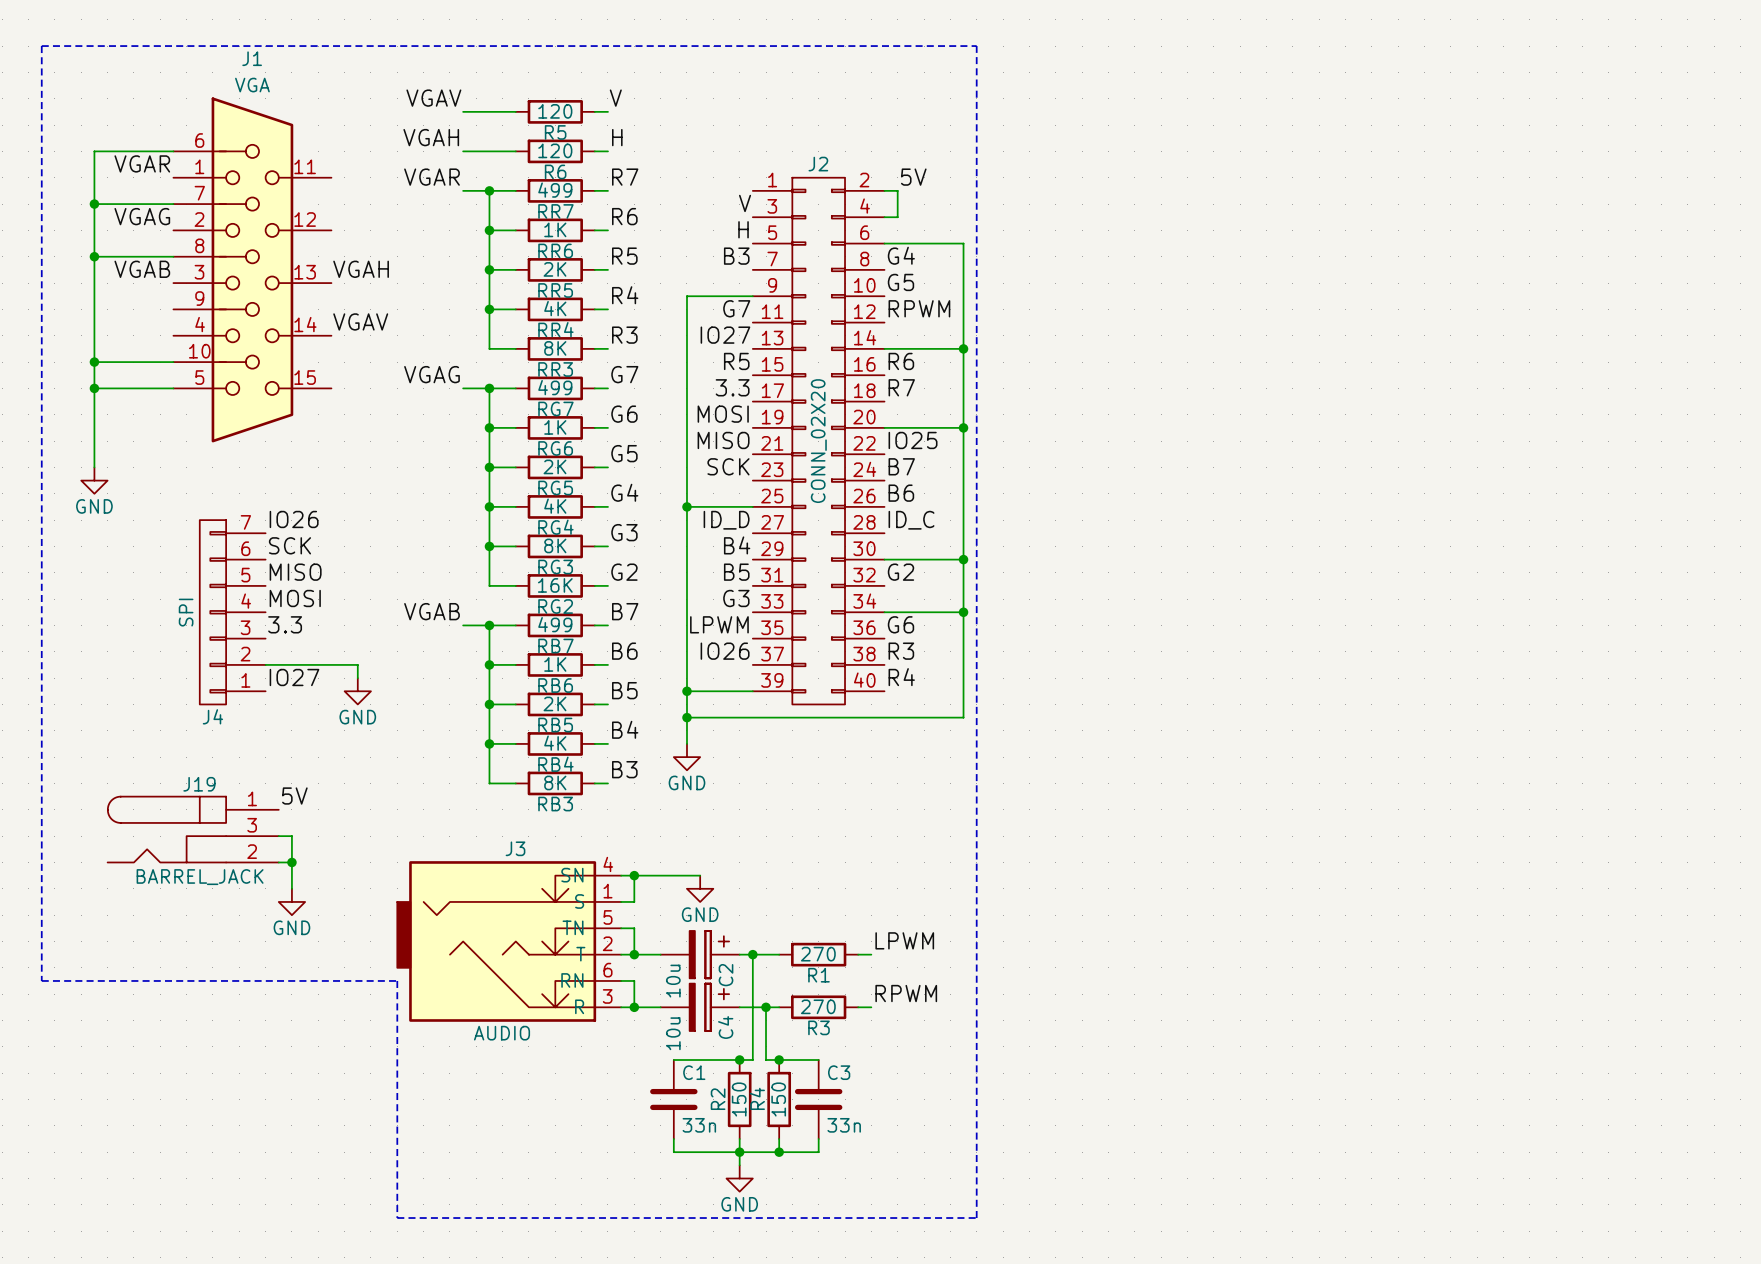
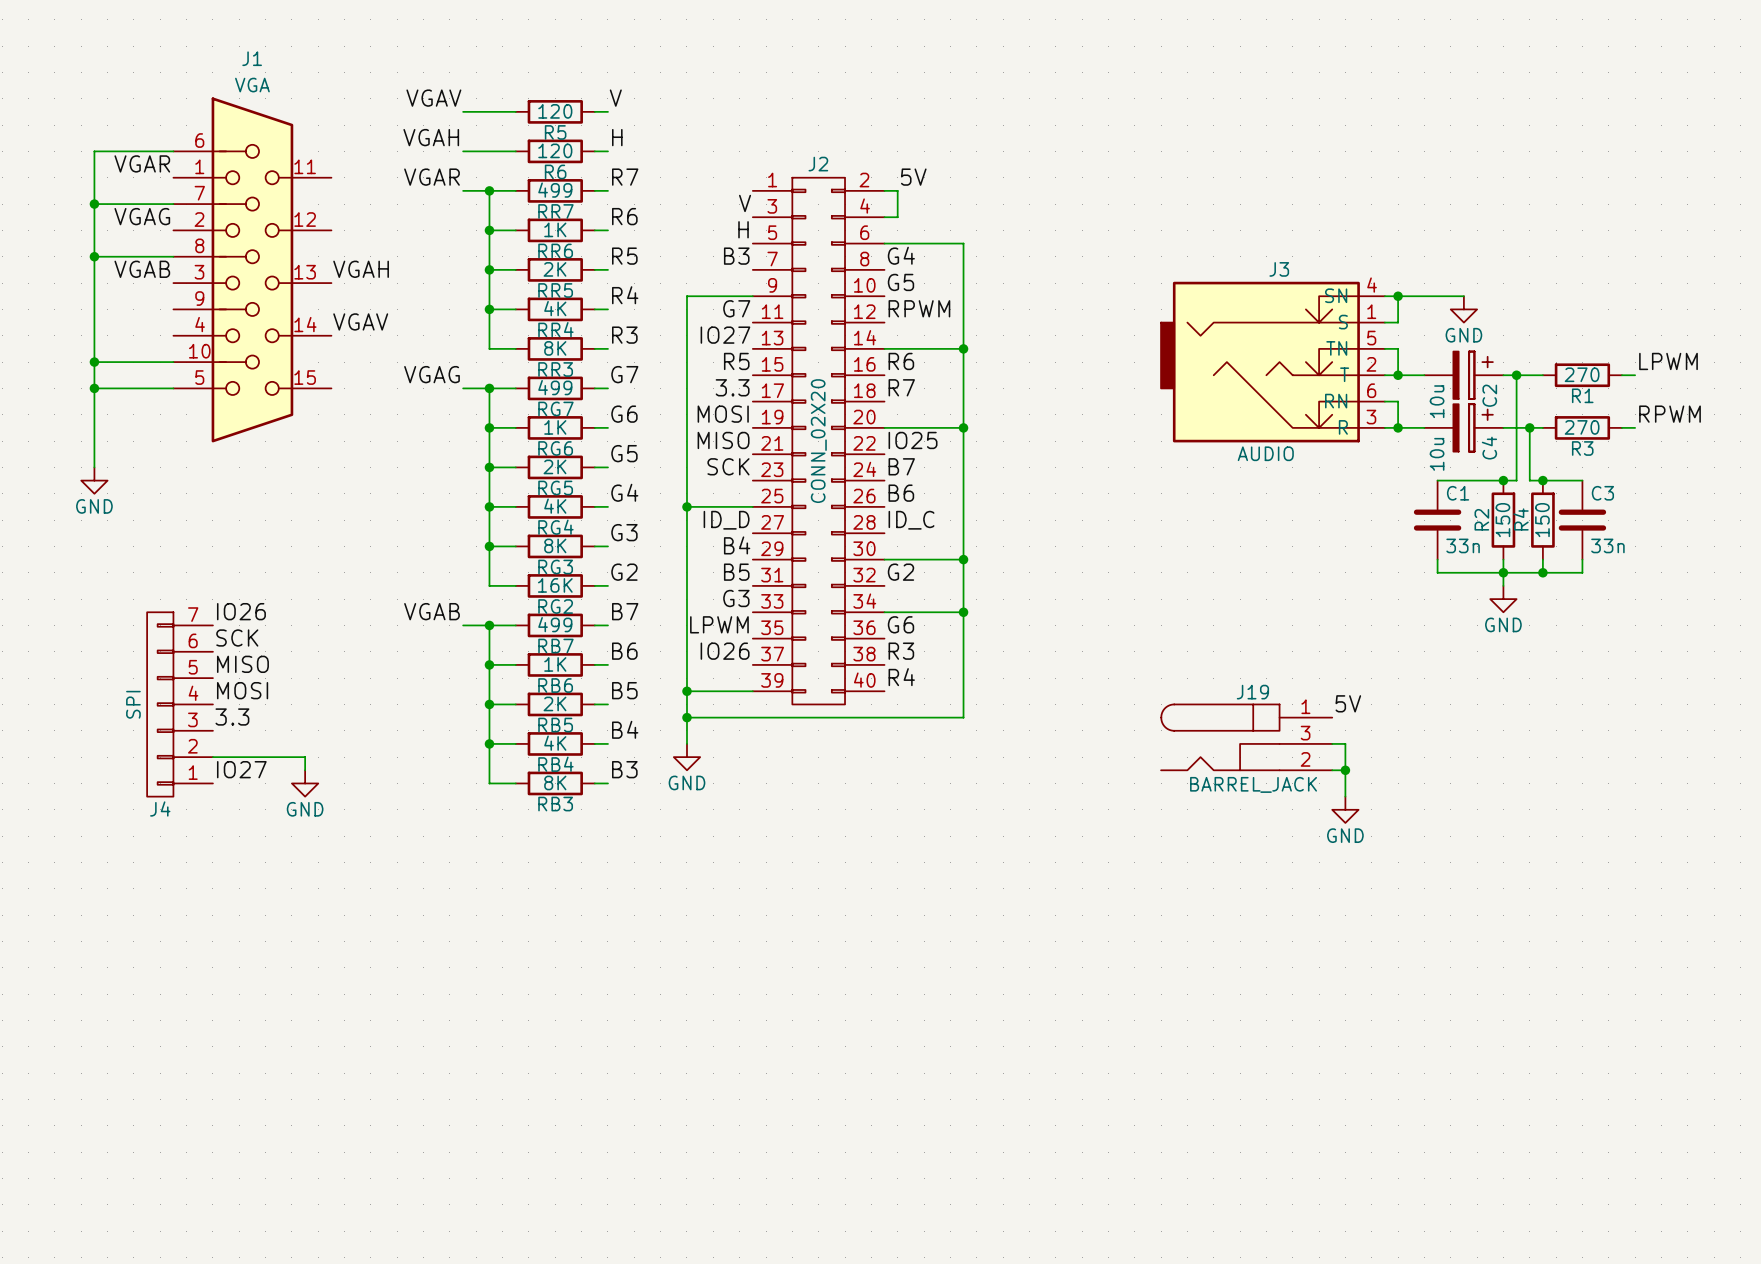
line: (41, 46) (976, 46) (976, 1218) (397, 1218) (397, 980) (41, 980) (41, 46) -> none
wire: none -> (1384, 296) (1463, 296)
wire: none -> (1398, 296) (1398, 322) (1384, 322)
junction: none -> (1398, 296)
power symbol: none -> GND (1463, 309)
wire: none -> (1384, 348) (1398, 348) (1398, 375)
label: none -> LPWM (1668, 361)
wire: none -> (1384, 375) (1424, 375)
junction: none -> (1398, 375)
wire: none -> (1503, 375) (1542, 375)
wire: none -> (1516, 375) (1516, 480) (1437, 480)
junction: none -> (1516, 375)
wire: none -> (1621, 375) (1635, 375)
wire: none -> (1384, 401) (1398, 401) (1398, 427)
label: none -> RPWM (1670, 414)
wire: none -> (1384, 427) (1424, 427)
junction: none -> (1398, 427)
wire: none -> (1503, 427) (1542, 427)
wire: none -> (1529, 427) (1529, 480) (1582, 480)
junction: none -> (1529, 427)
wire: none -> (1621, 427) (1635, 427)
junction: none -> (1503, 480)
junction: none -> (1542, 480)
label position: IO26 (294, 519) -> IO26 (241, 611)
label position: SCK (289, 545) -> SCK (237, 637)
wire: none -> (1437, 559) (1437, 572) (1582, 572) (1582, 559)
wire: none -> (1503, 559) (1503, 585)
wire: none -> (1542, 559) (1542, 572)
label position: MISO (295, 572) -> MISO (242, 664)
junction: none -> (1503, 572)
junction: none -> (1542, 572)
label position: MOSI (295, 598) -> MOSI (242, 690)
power symbol: none -> GND (1503, 599)
J4 position: (232, 612) -> (180, 704)
label position: 3.3 (285, 624) -> 3.3 (232, 717)
wire: (265, 664) (357, 664) (357, 678) -> (212, 757) (305, 757) (305, 770)
label position: IO27 (294, 677) -> IO27 (241, 769)
power symbol: GND (357, 691) -> none
label: none -> 5V (1348, 703)
wire: none -> (1332, 743) (1345, 743) (1345, 796)
wire: none -> (1332, 770) (1345, 770)
junction: none -> (1345, 770)
power symbol: none -> GND (305, 783)
label: 5V (294, 796) -> none
power symbol: none -> GND (1345, 809)
J19 position: (193, 829) -> (1246, 737)
wire: (278, 836) (291, 836) (291, 888) -> none
wire: (278, 862) (291, 862) -> none
junction: (291, 862) -> none
wire: (621, 875) (700, 875) -> none
wire: (634, 875) (634, 901) (621, 901) -> none
junction: (634, 875) -> none
power symbol: GND (700, 888) -> none
power symbol: GND (291, 901) -> none
wire: (621, 928) (634, 928) (634, 954) -> none
label: LPWM (904, 940) -> none
J3 position: (509, 941) -> (1272, 362)
wire: (621, 954) (660, 954) -> none
junction: (634, 954) -> none
C2 position: (700, 954) -> (1463, 375)
wire: (739, 954) (779, 954) -> none
wire: (752, 954) (752, 1059) (673, 1059) -> none
junction: (752, 954) -> none
R1 position: (818, 954) -> (1582, 375)
wire: (858, 954) (871, 954) -> none
wire: (621, 980) (634, 980) (634, 1007) -> none
label: RPWM (906, 993) -> none
wire: (621, 1007) (660, 1007) -> none
junction: (634, 1007) -> none
C4 position: (700, 1007) -> (1463, 427)
wire: (739, 1007) (779, 1007) -> none
wire: (766, 1007) (766, 1059) (818, 1059) -> none
junction: (766, 1007) -> none
R3 position: (818, 1007) -> (1582, 427)
wire: (858, 1007) (871, 1007) -> none
junction: (739, 1059) -> none
junction: (779, 1059) -> none
C1 position: (673, 1099) -> (1437, 520)
R2 position: (739, 1099) -> (1503, 520)
R4 position: (779, 1099) -> (1542, 520)
C3 position: (818, 1099) -> (1582, 520)
wire: (673, 1139) (673, 1152) (818, 1152) (818, 1139) -> none
wire: (739, 1139) (739, 1165) -> none
wire: (779, 1139) (779, 1152) -> none
junction: (739, 1152) -> none
junction: (779, 1152) -> none
power symbol: GND (739, 1178) -> none

